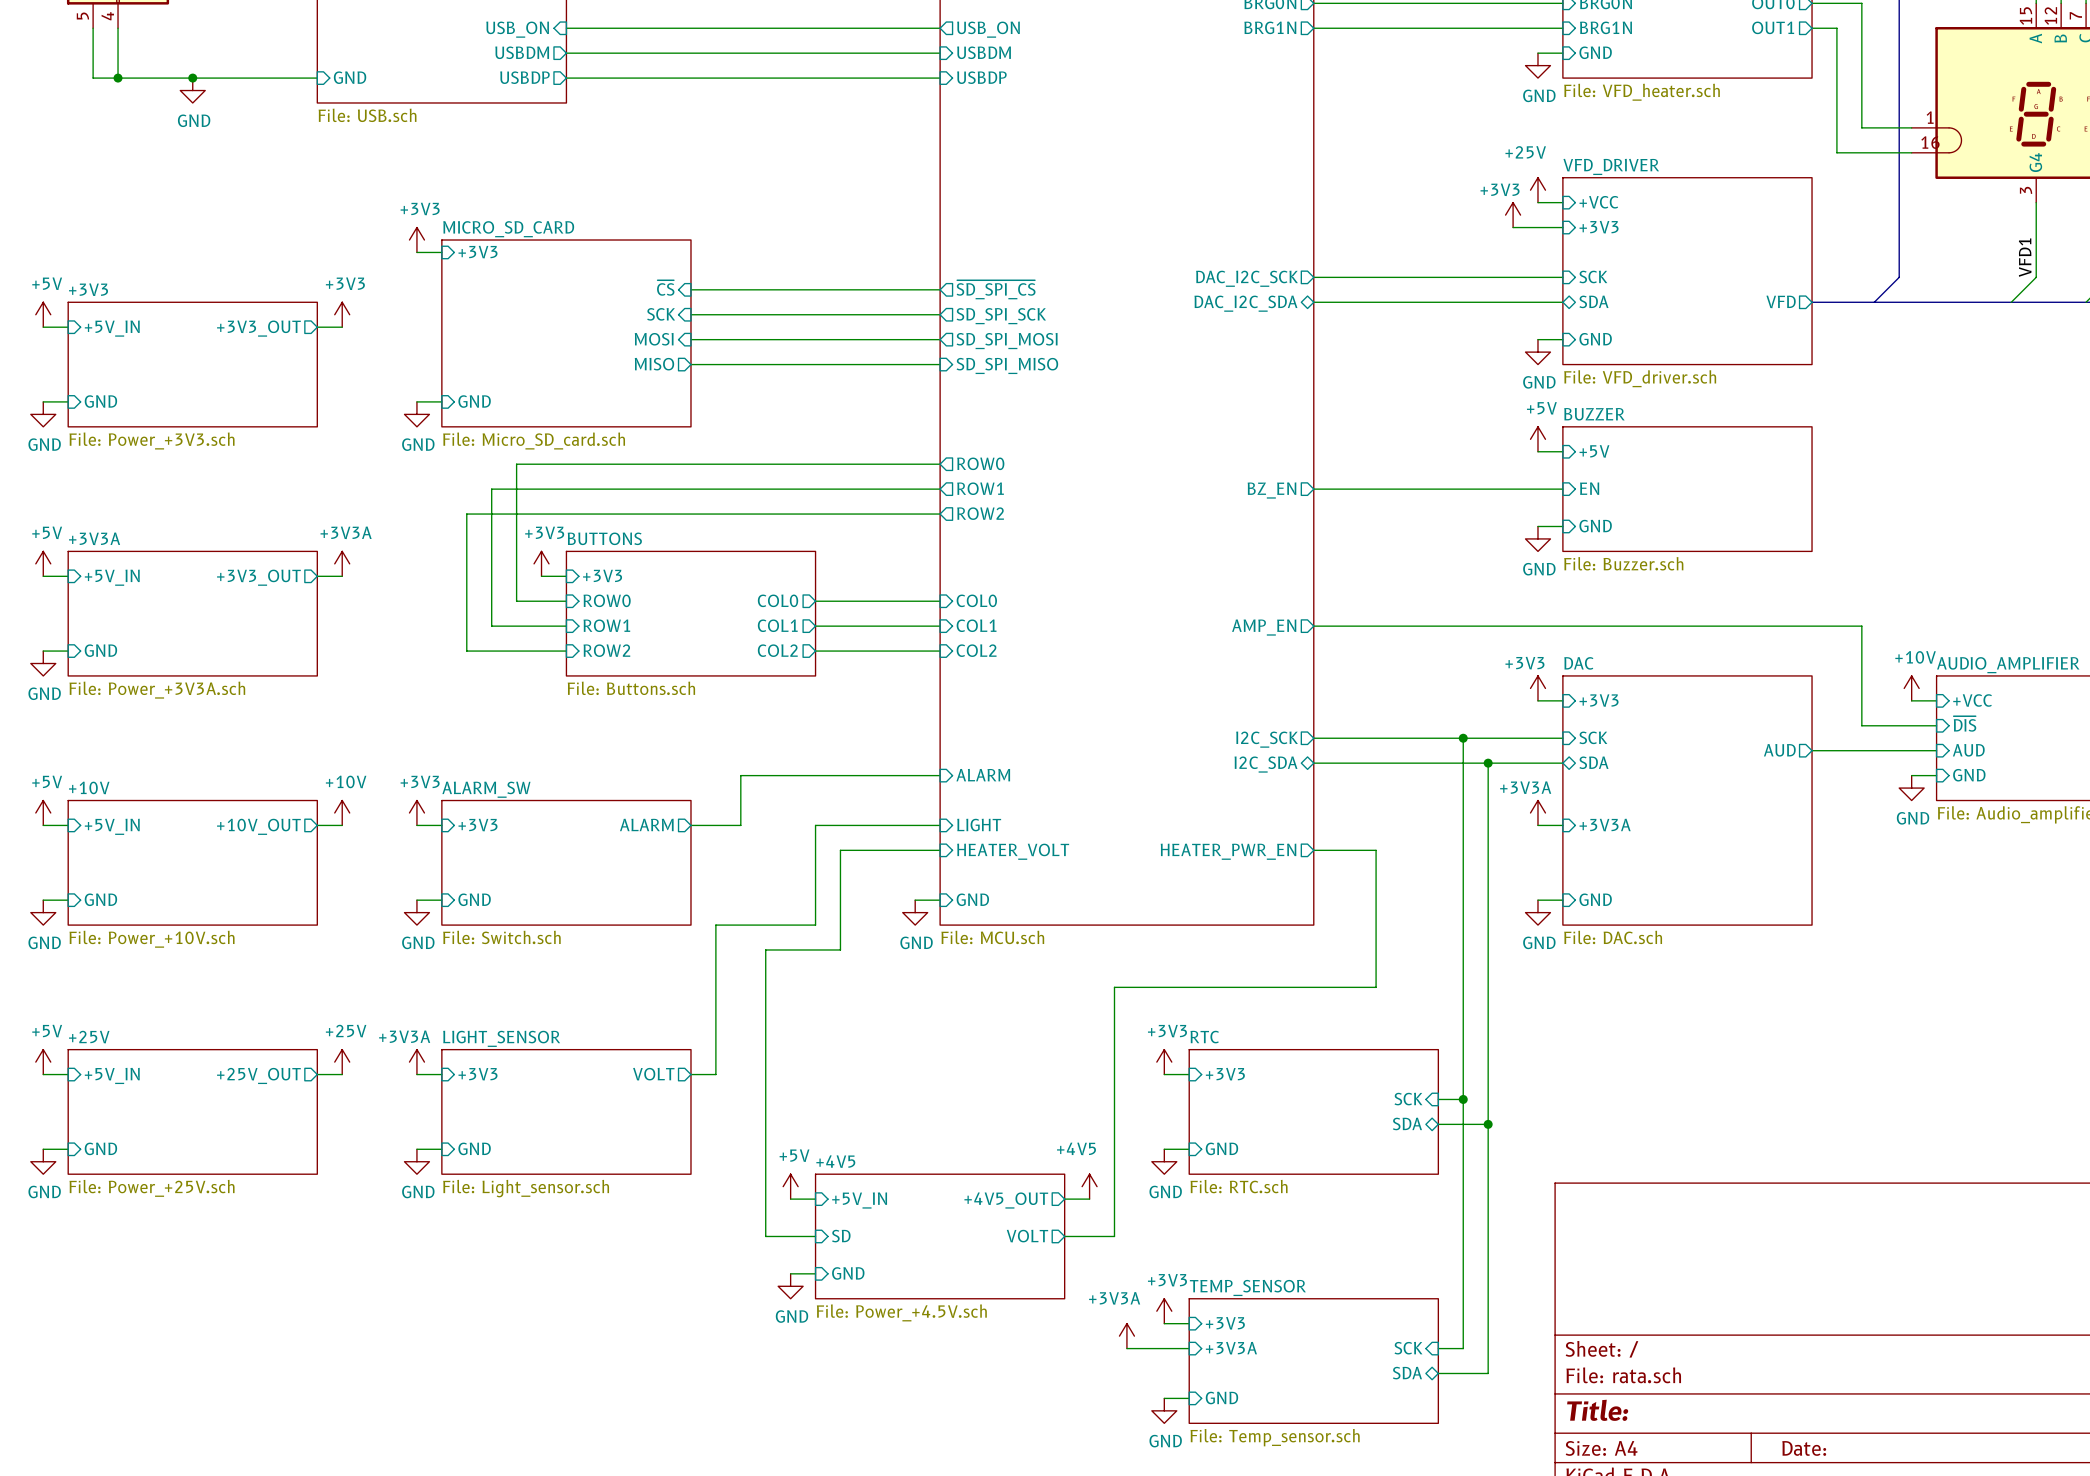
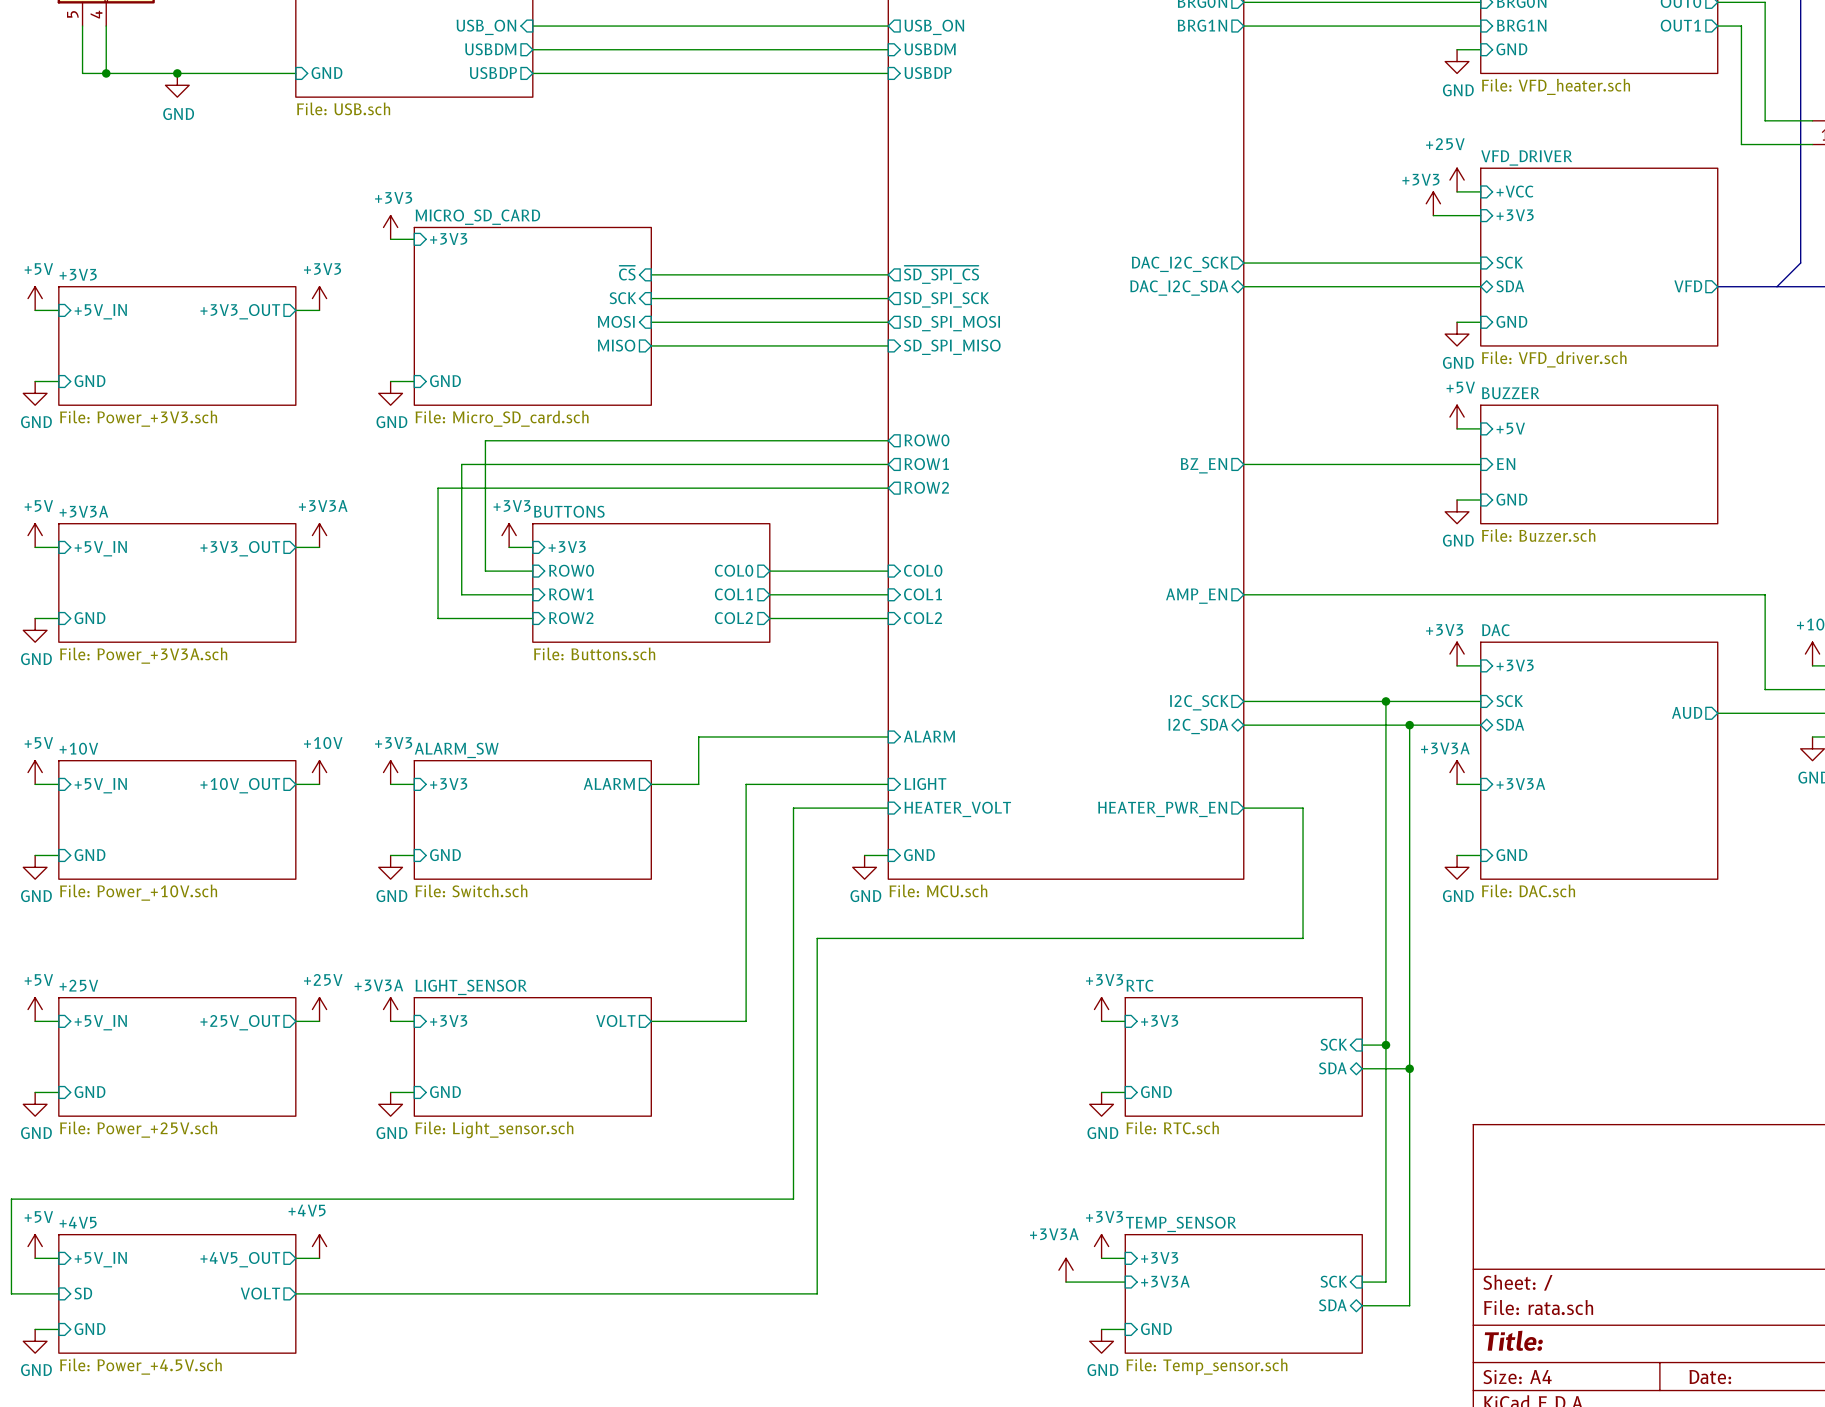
wire: (815, 825) (815, 925) (715, 925) (715, 1074) -> (769, 784) (746, 784) (746, 1021) (675, 1021)
wire: (840, 949) (765, 949) (765, 1236) (815, 1236) -> (793, 902) (793, 1199) (11, 1199) (11, 1293) (58, 1293)
wire: (1114, 987) (1114, 1236) (1064, 1236) -> (1054, 938) (817, 938) (817, 1293) (295, 1293)
power symbol: +5V (790, 1186) -> none
power symbol: +4V5 (1089, 1186) -> none
wire: (790, 1199) (815, 1199) -> none
wire: (1064, 1199) (1089, 1199) -> none
sheet pin: +5V_IN (859, 1200) -> none
sheet pin: +4V5_OUT (1006, 1200) -> none
sheet pin: SD (841, 1236) -> none
sheet +4V5 position: (940, 1236) -> (177, 1293)
sheet pin: VOLT (1027, 1236) -> none
wire: (790, 1273) (815, 1273) -> none
sheet pin: GND (848, 1273) -> none
power symbol: GND (790, 1286) -> none
power symbol: none -> +5V (35, 1246)
power symbol: none -> +4V5 (319, 1246)
wire: none -> (35, 1258) (58, 1258)
wire: none -> (295, 1258) (319, 1258)
sheet pin: none -> +5V_IN (100, 1259)
sheet pin: none -> +4V5_OUT (240, 1259)
sheet pin: none -> SD (83, 1293)
sheet pin: none -> VOLT (260, 1293)
wire: none -> (35, 1329) (58, 1329)
sheet pin: none -> GND (89, 1329)
power symbol: none -> GND (35, 1341)

